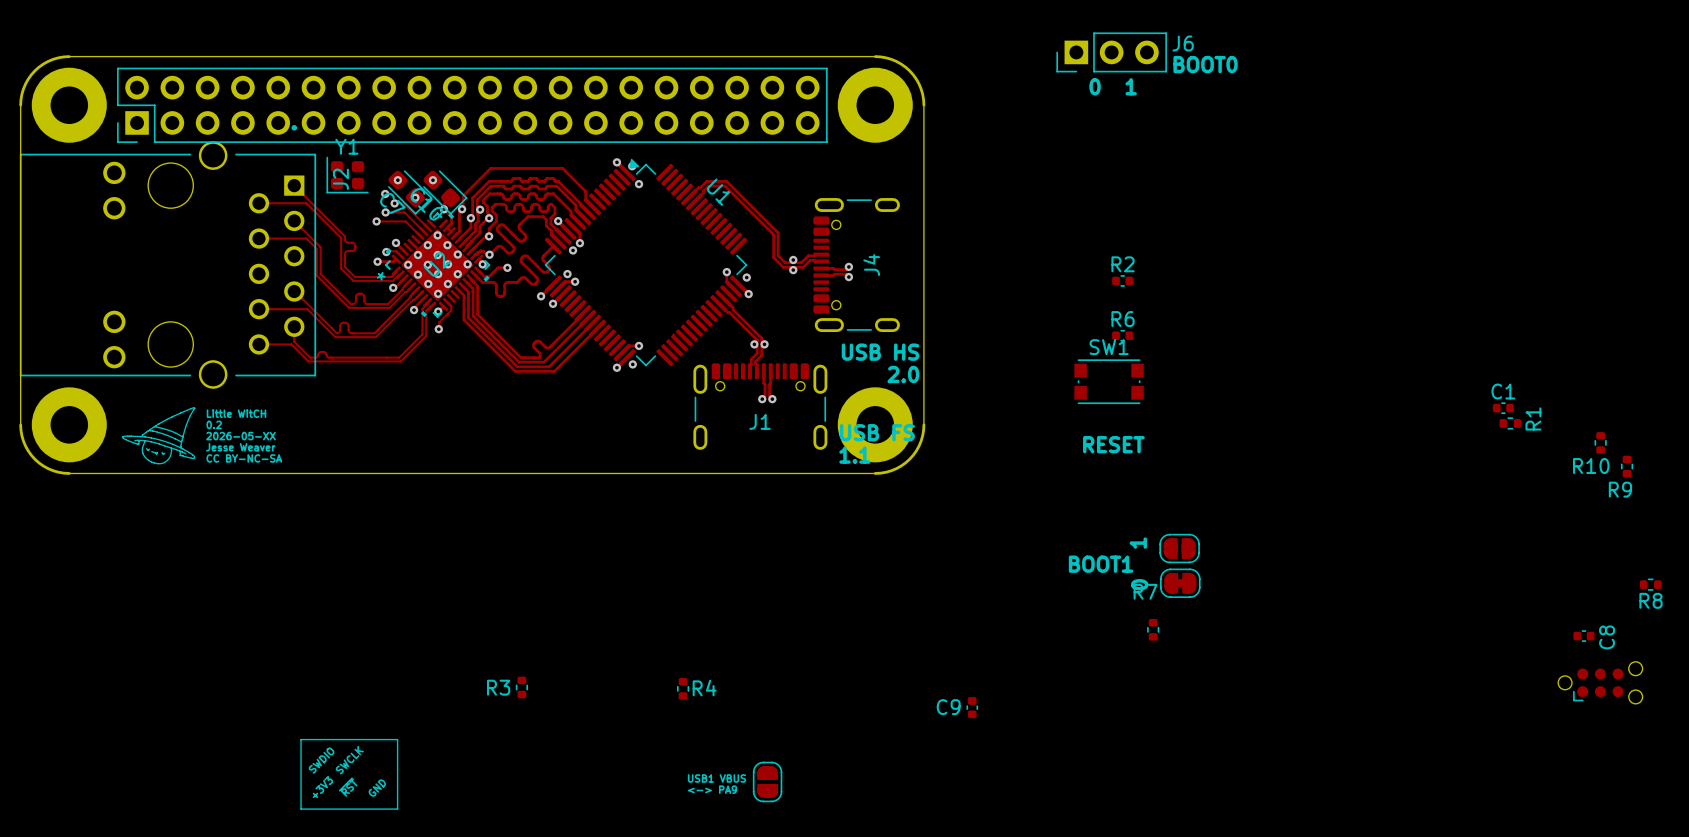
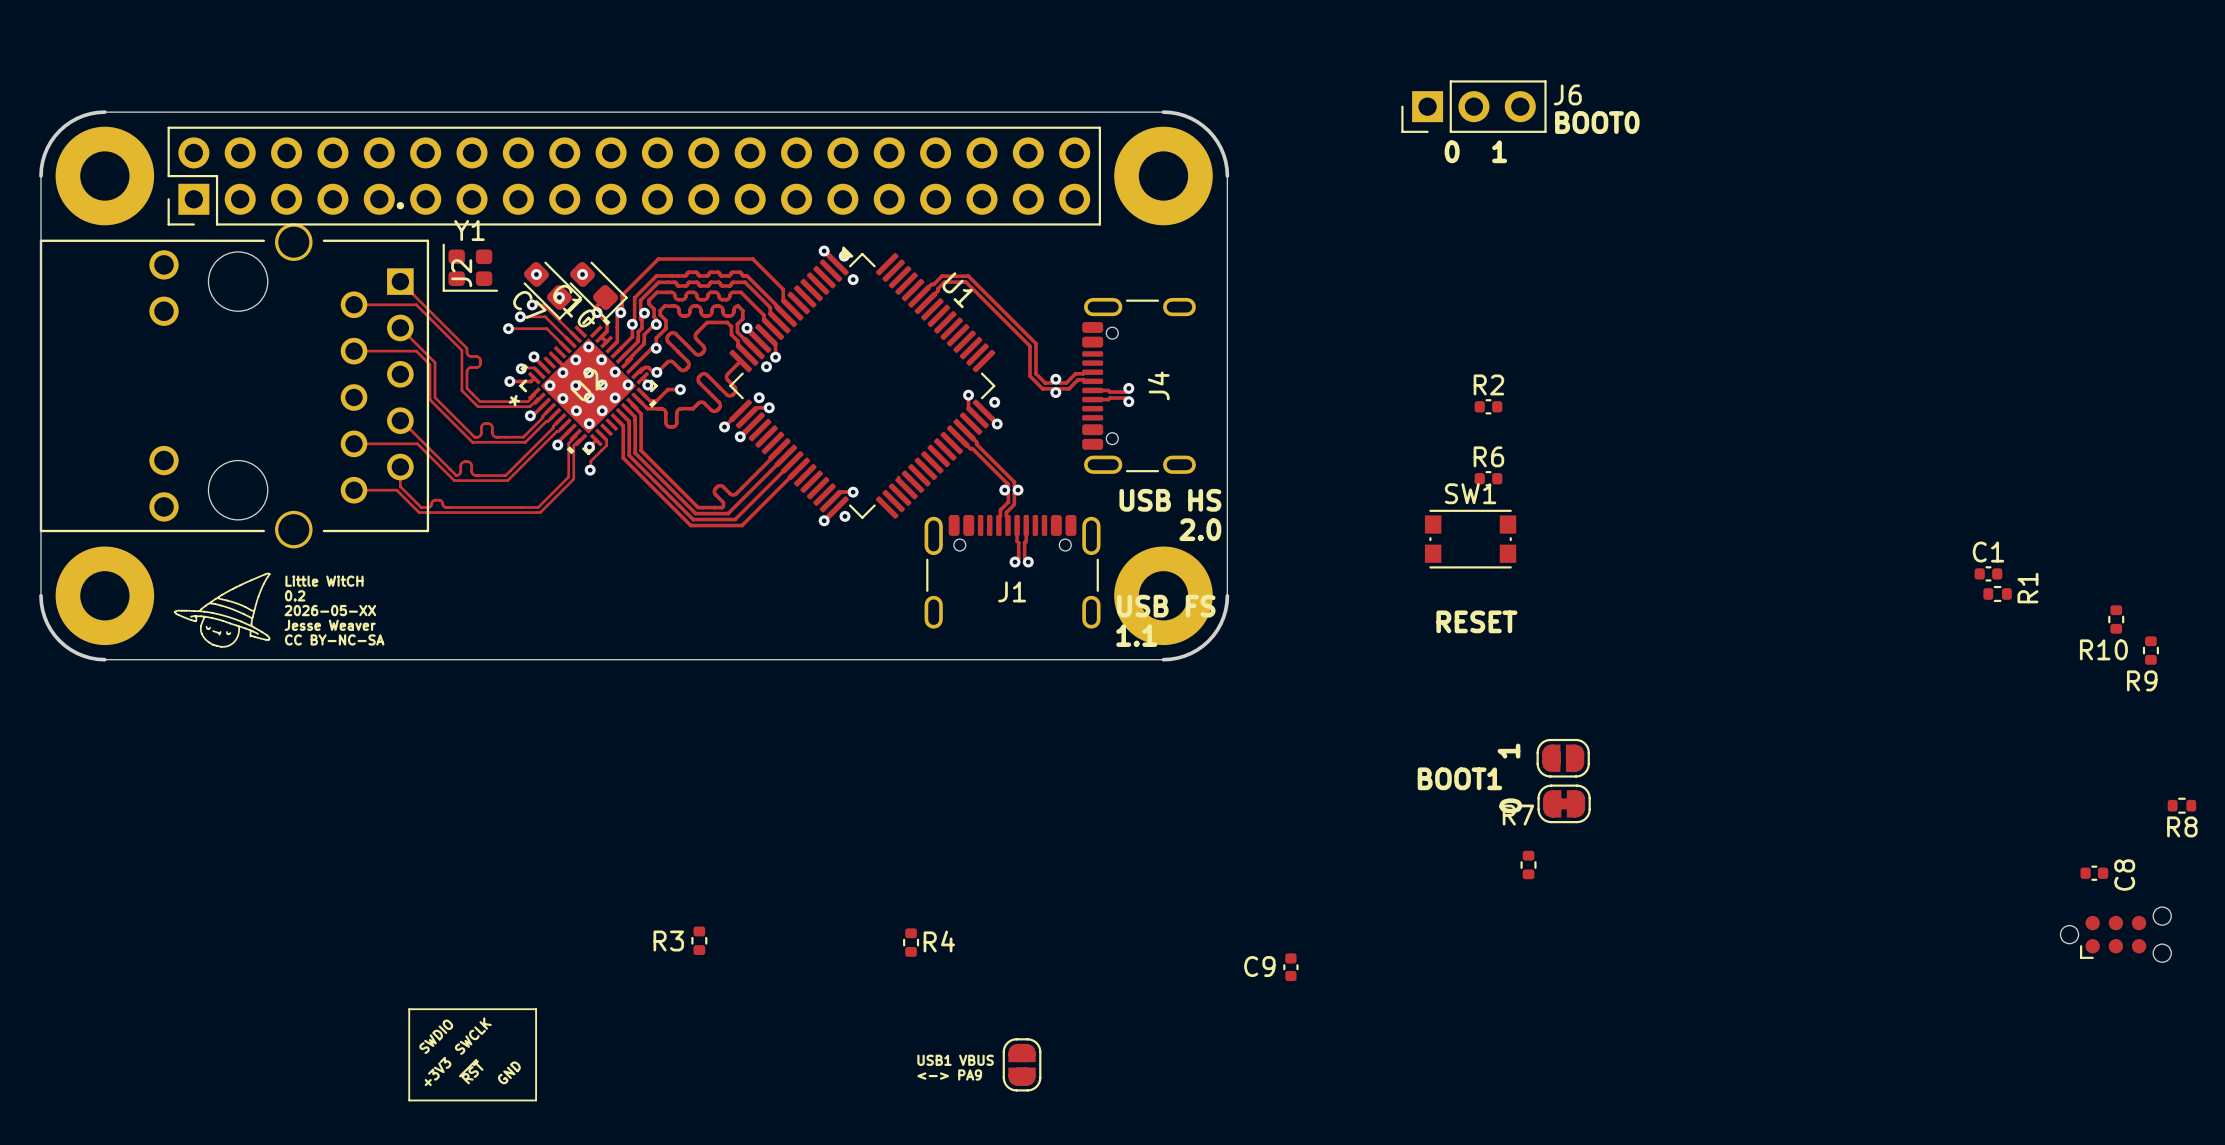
via: (385, 193) -> none

